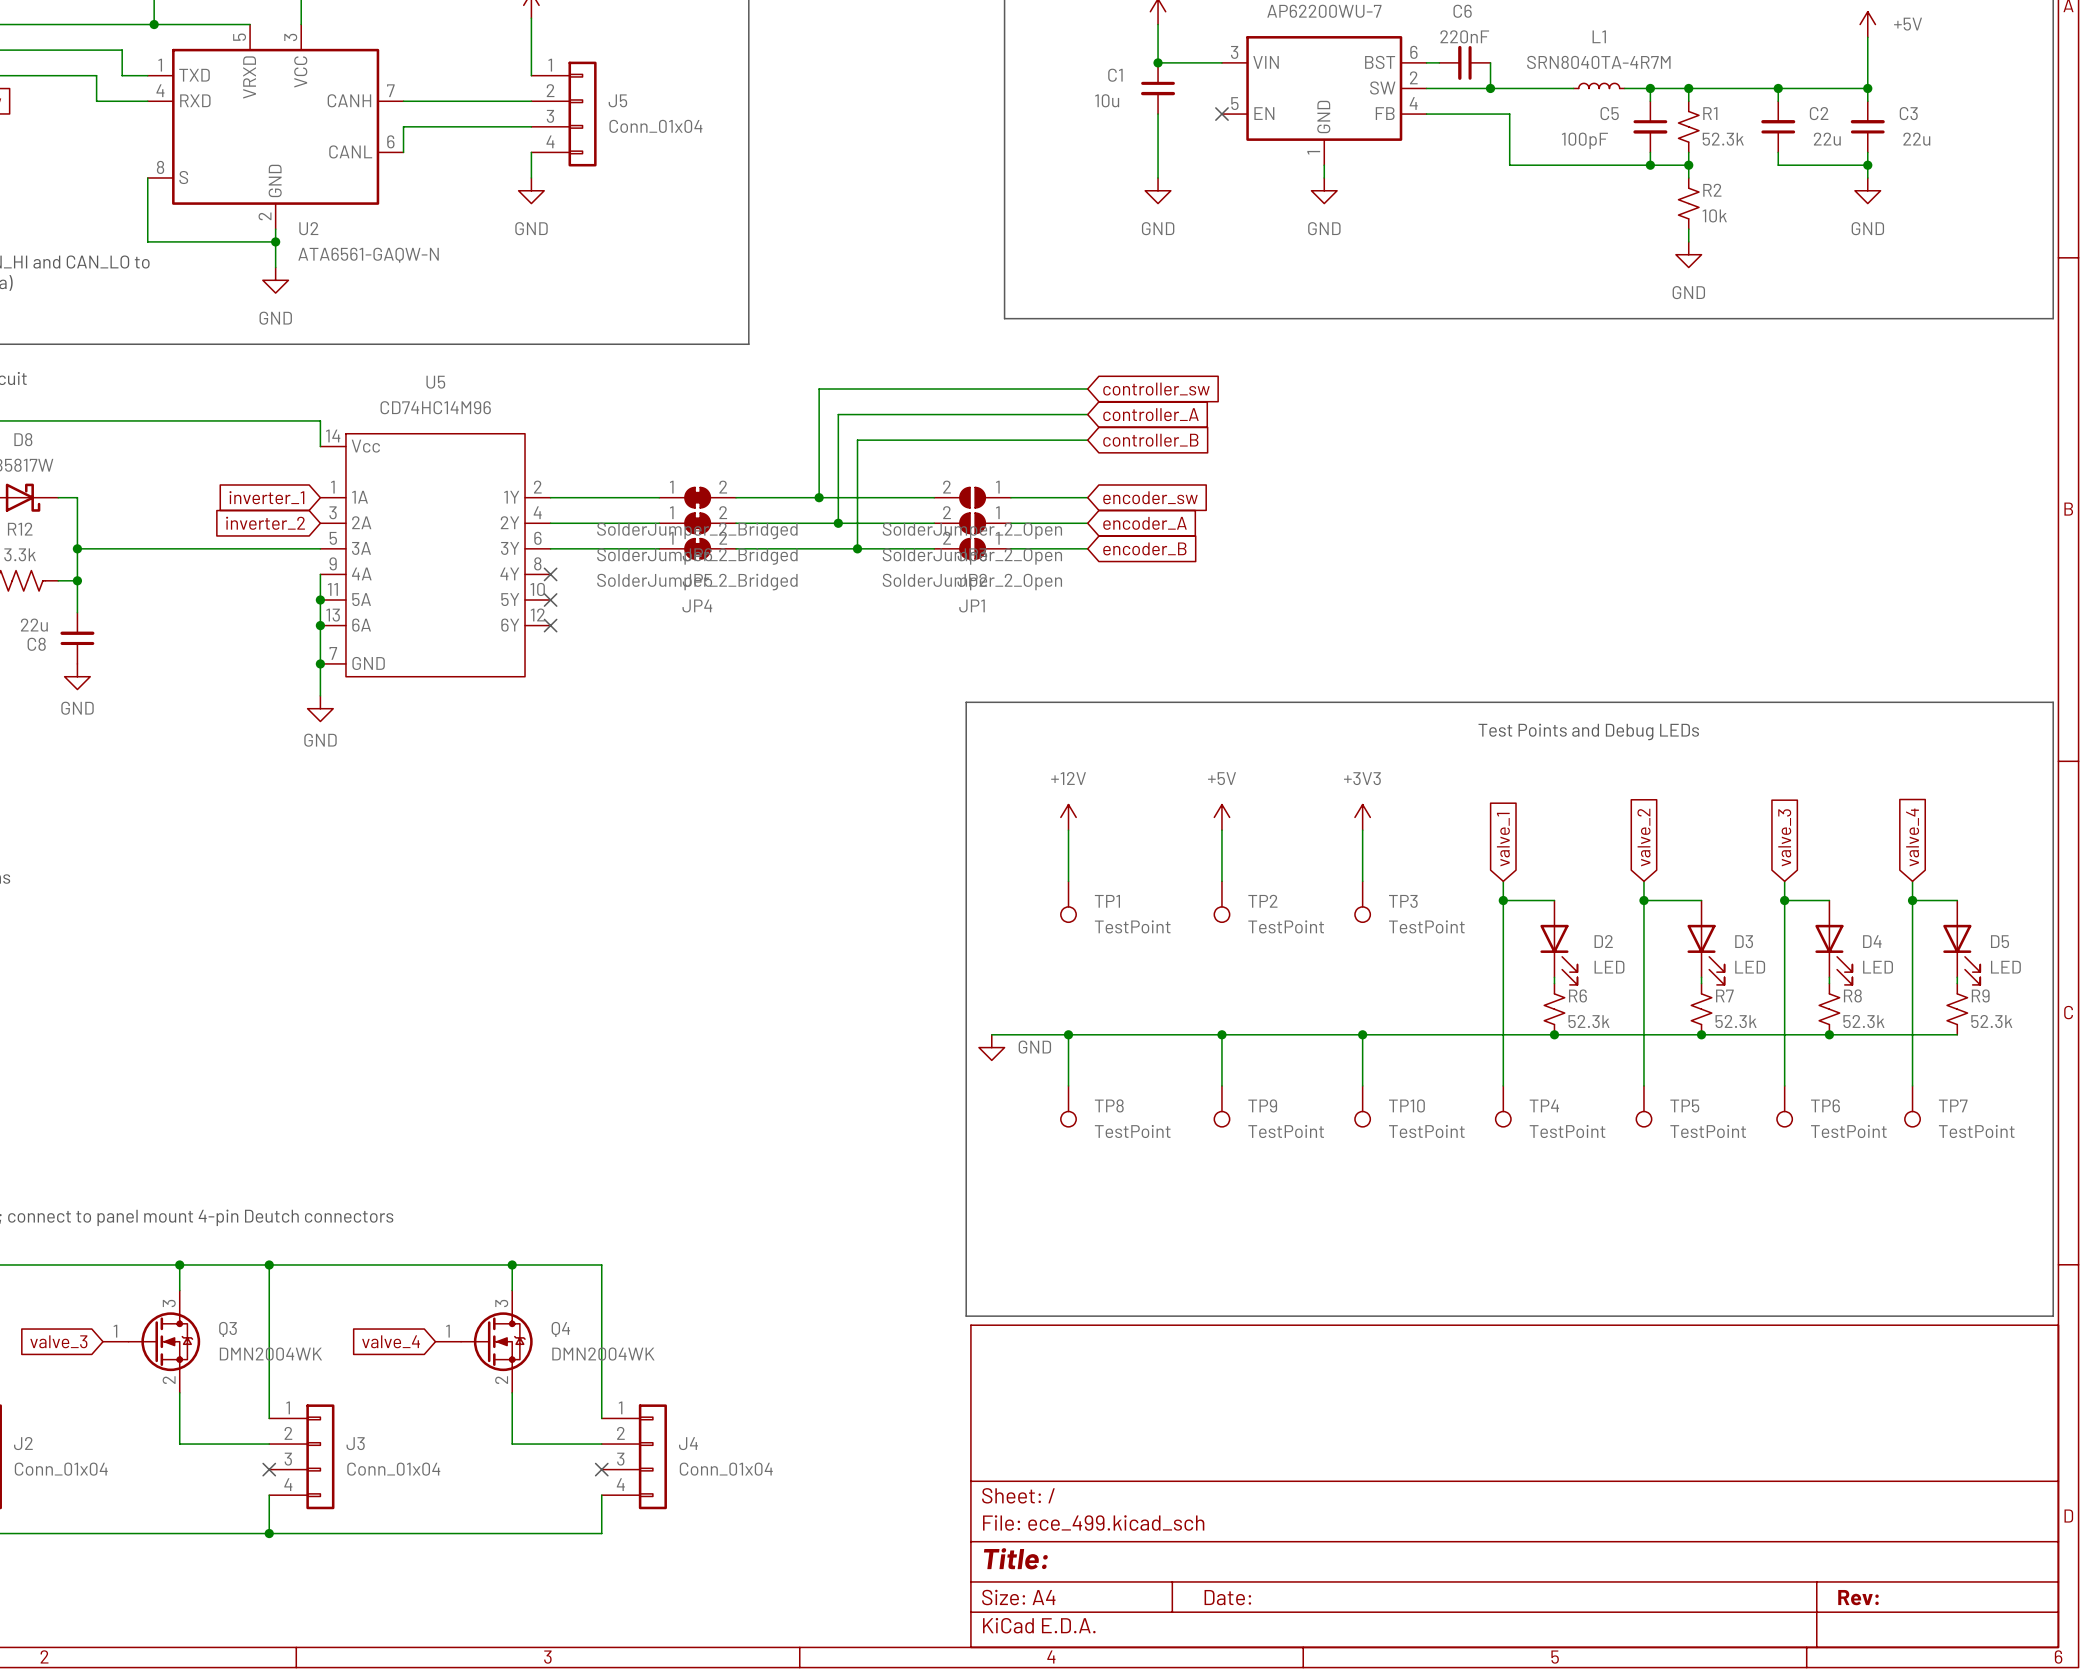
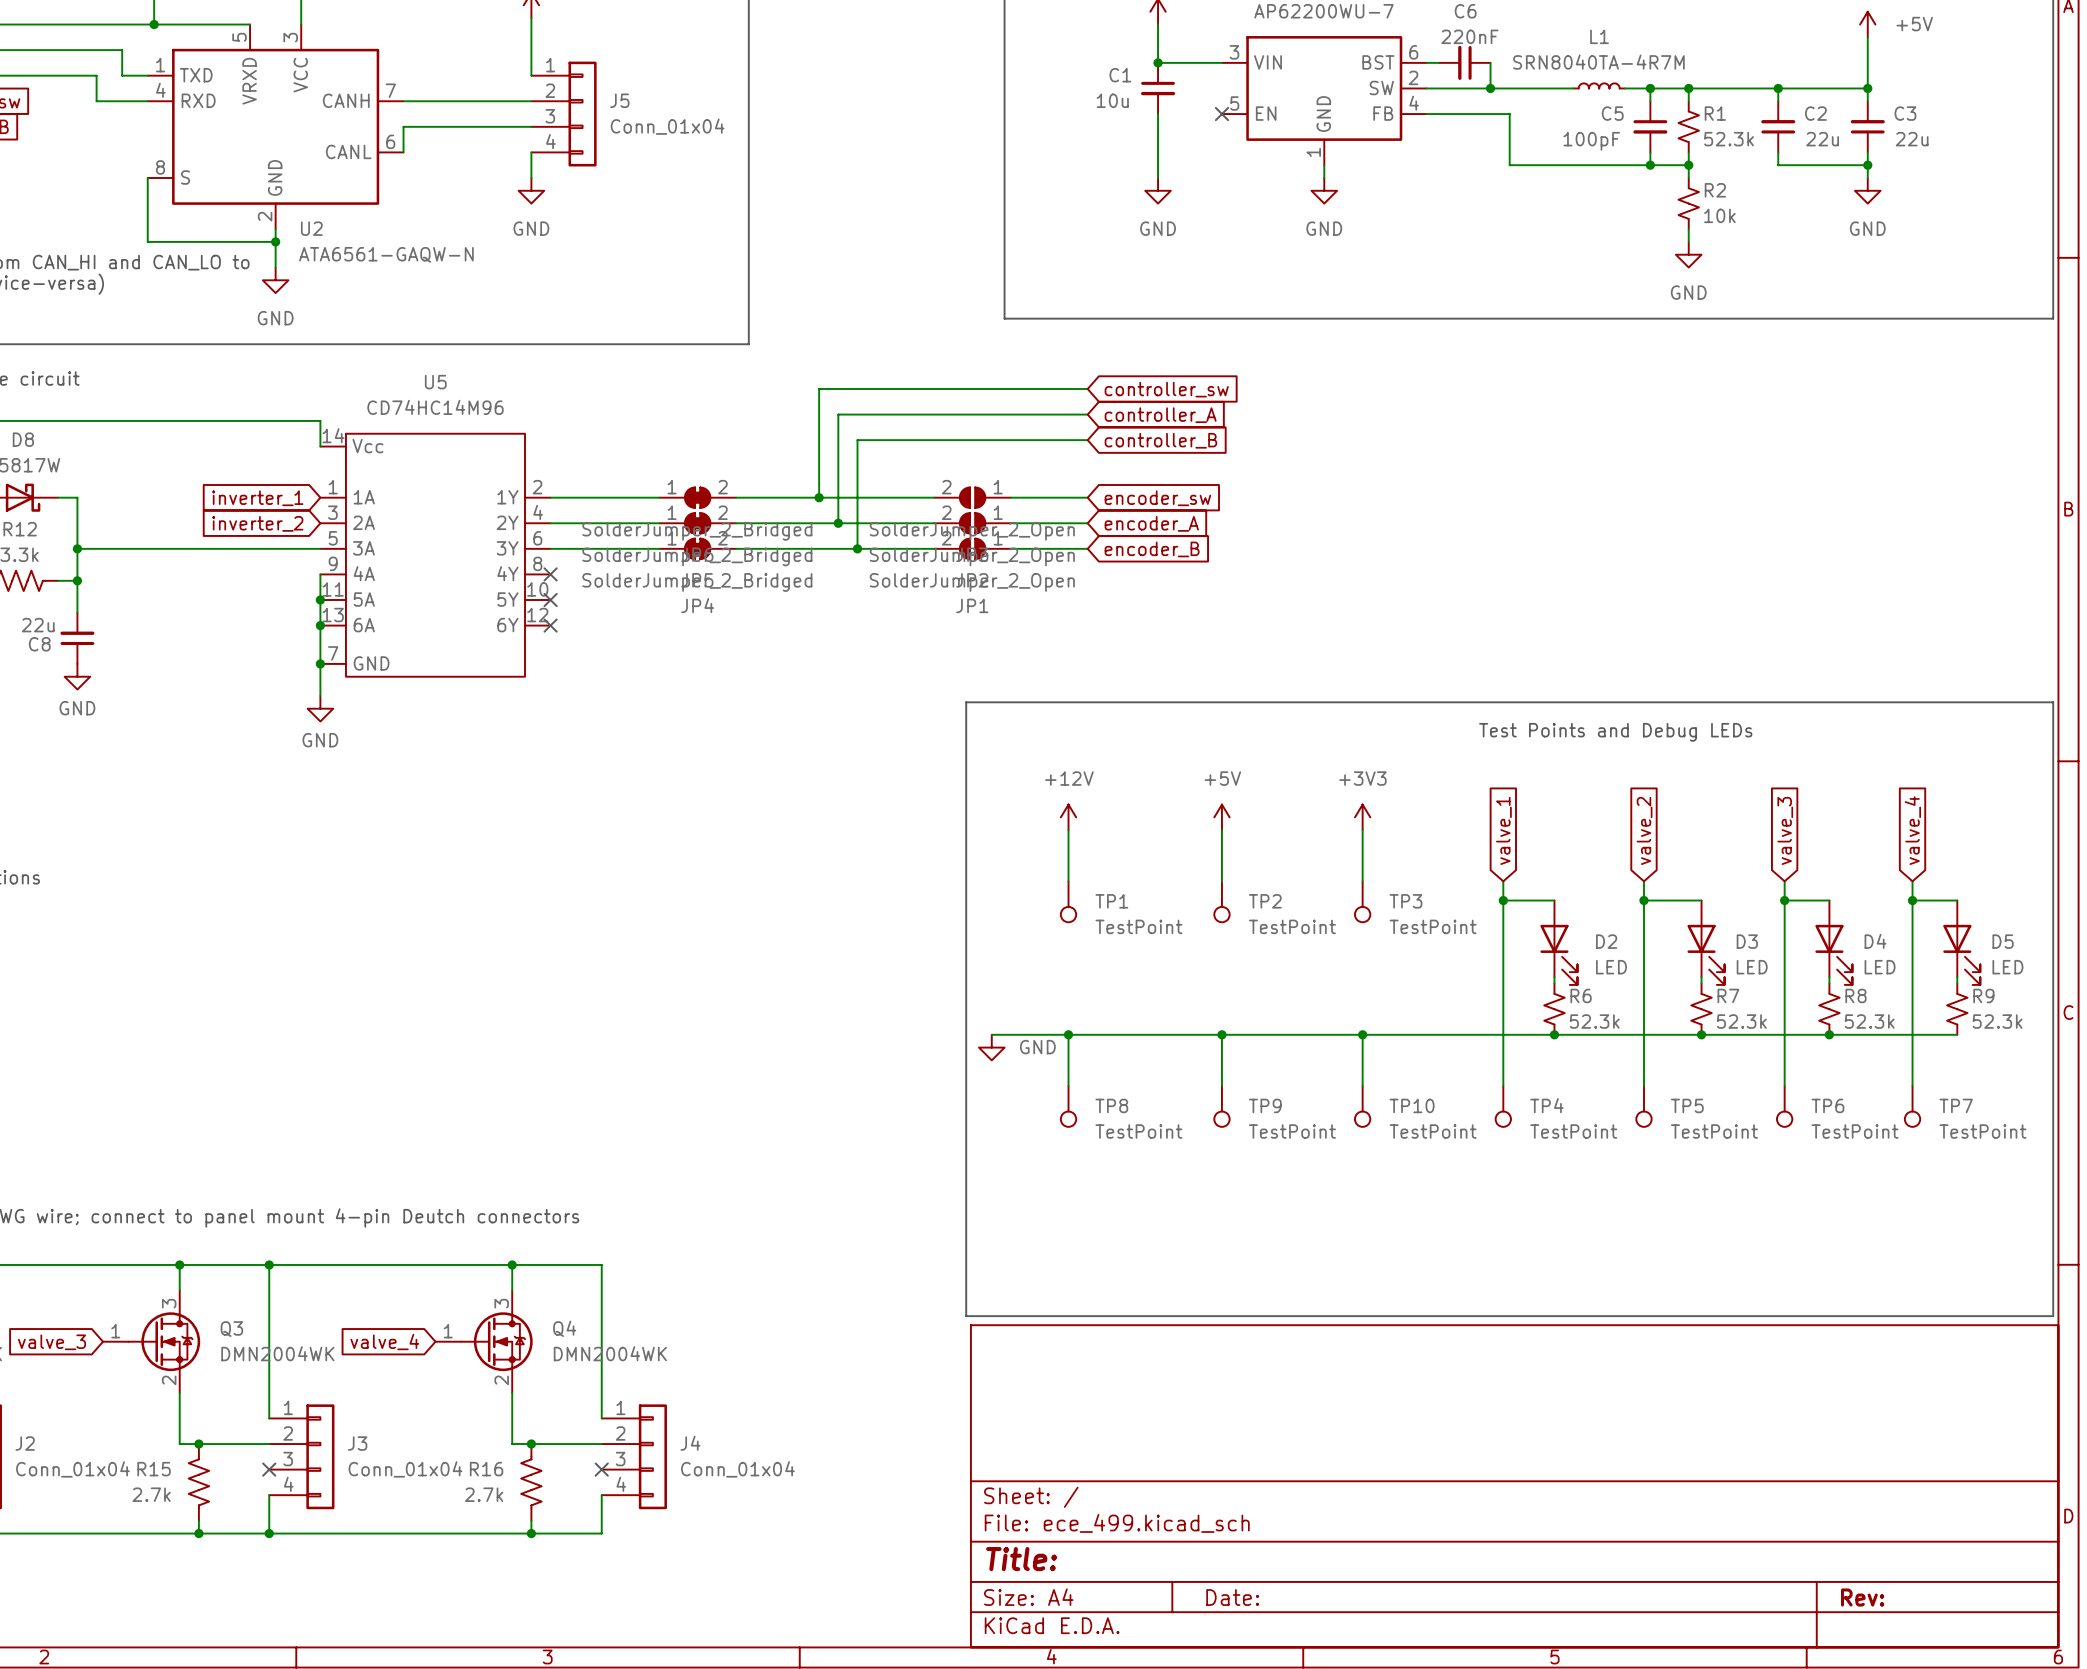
junction: none -> (198, 1444)
junction: none -> (531, 1444)
R15: none -> 2.7k (198, 1482)
R16: none -> 2.7k (531, 1482)
wire: none -> (198, 1520) (198, 1533)
wire: none -> (531, 1520) (531, 1533)
junction: none -> (198, 1533)
junction: none -> (531, 1533)

